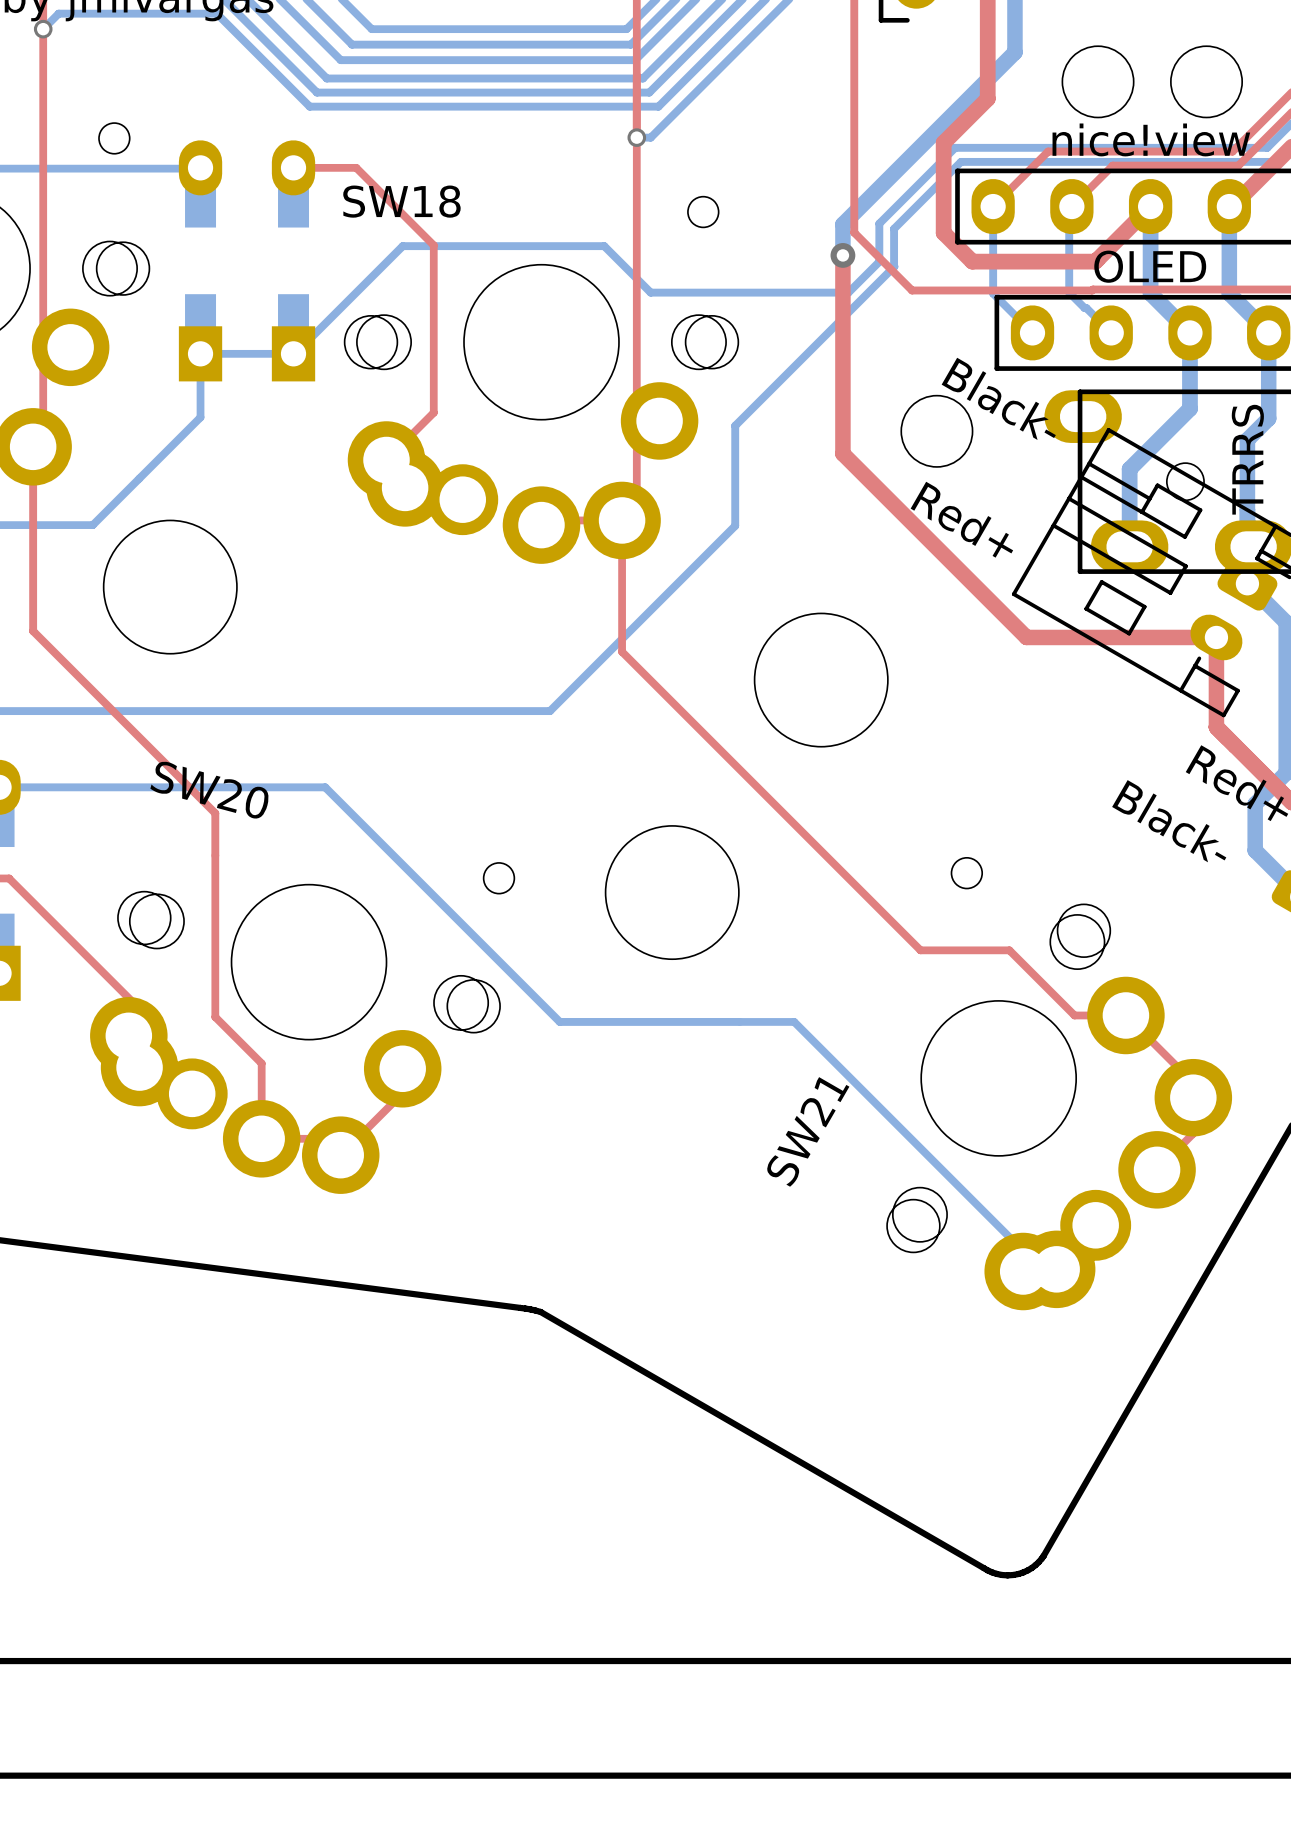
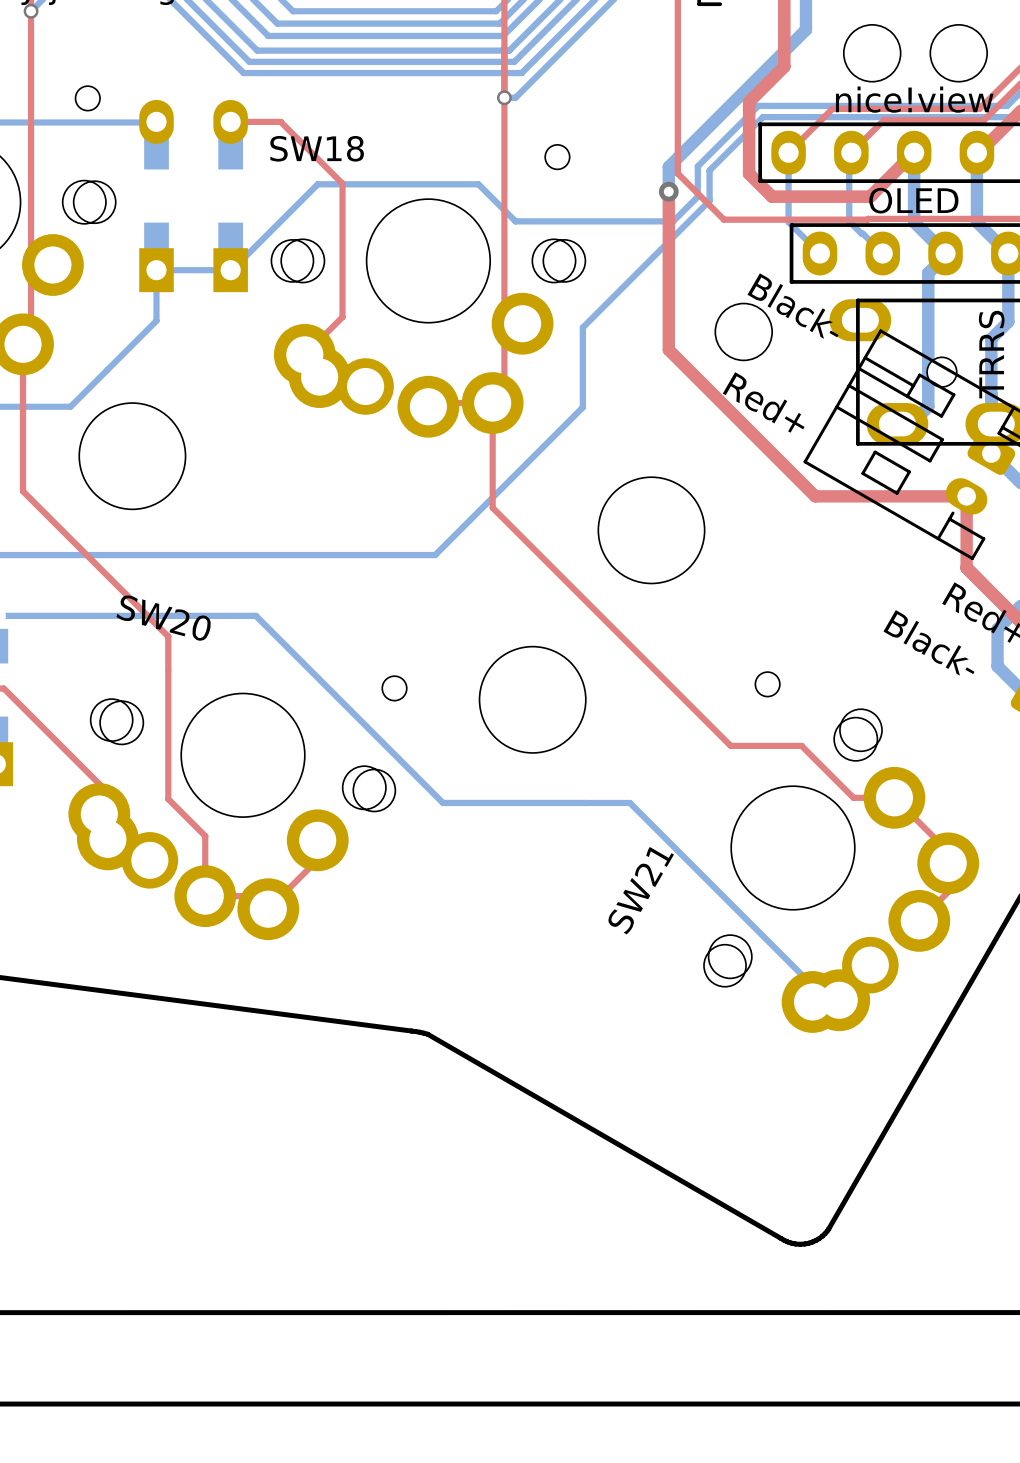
bottom track: (1189, 335) (1189, 408) (1129, 469) (1129, 529) -> (945, 255) (928, 273) (928, 406) (911, 424)

